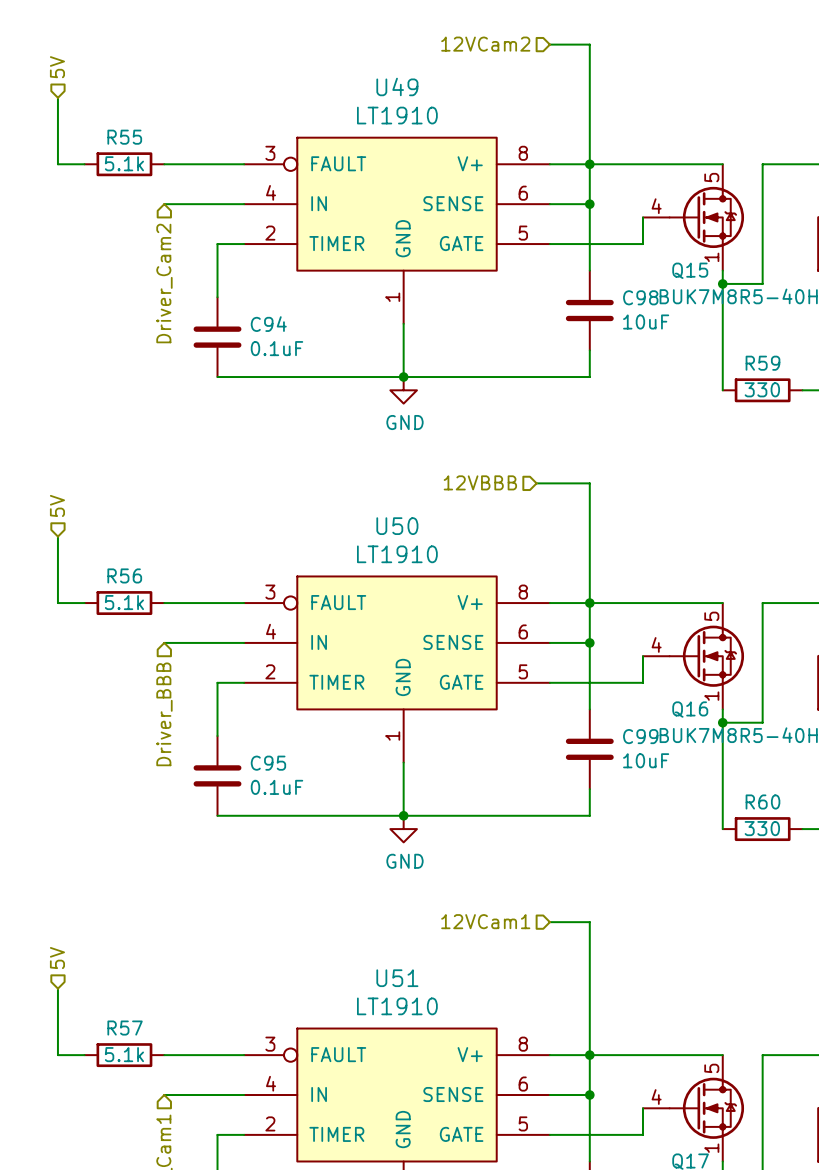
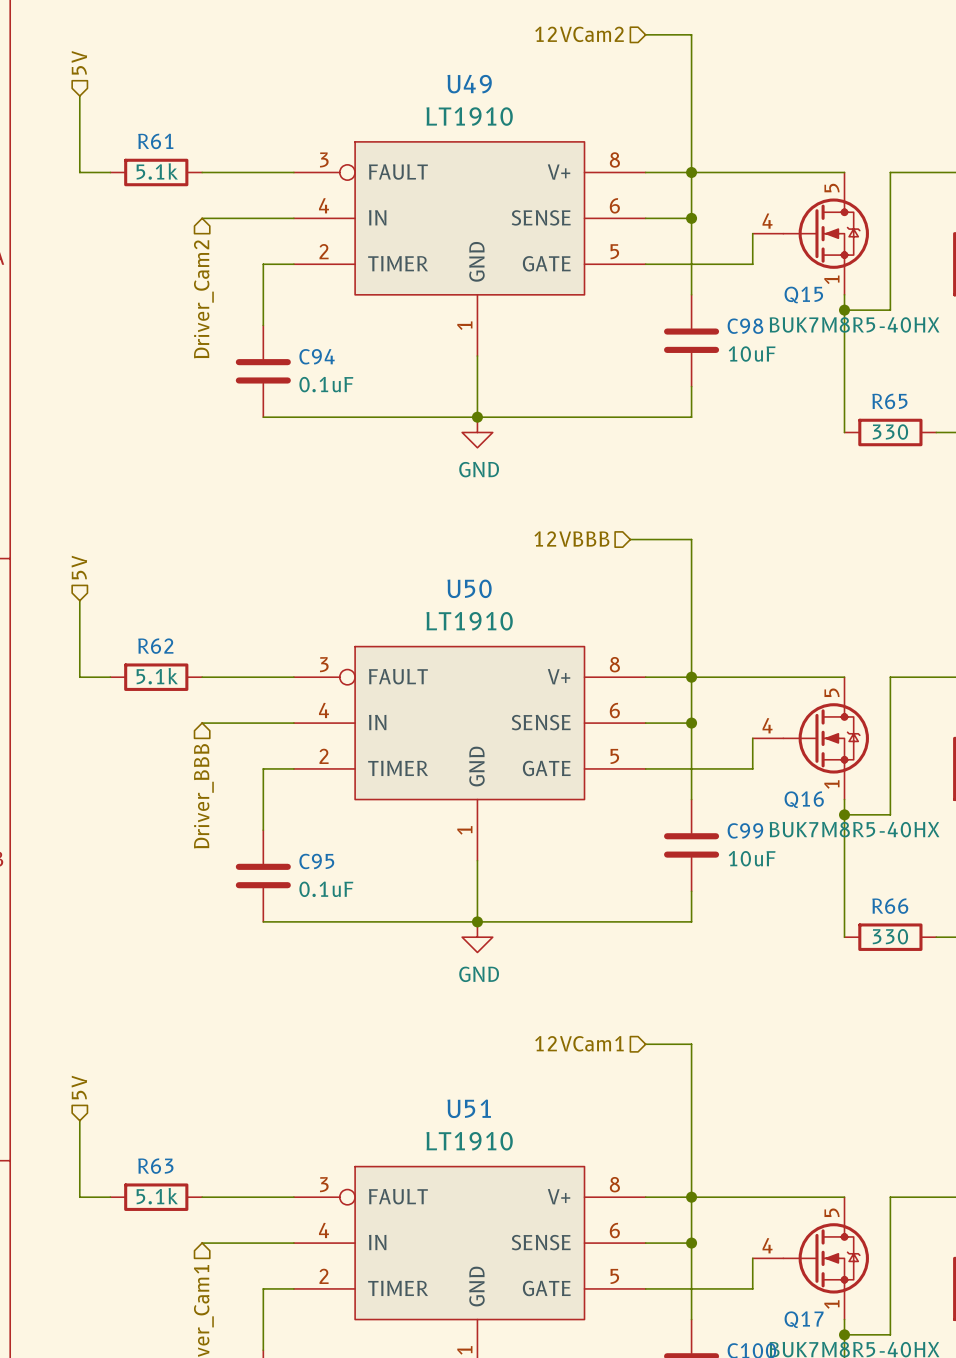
R55 name: R55 (124, 137) -> R61 (155, 141)
R59 name: R59 (762, 363) -> R65 (889, 401)
R56 name: R56 (124, 575) -> R62 (155, 646)
R60 name: R60 (762, 801) -> R66 (890, 906)
R57 name: R57 (125, 1028) -> R63 (155, 1166)

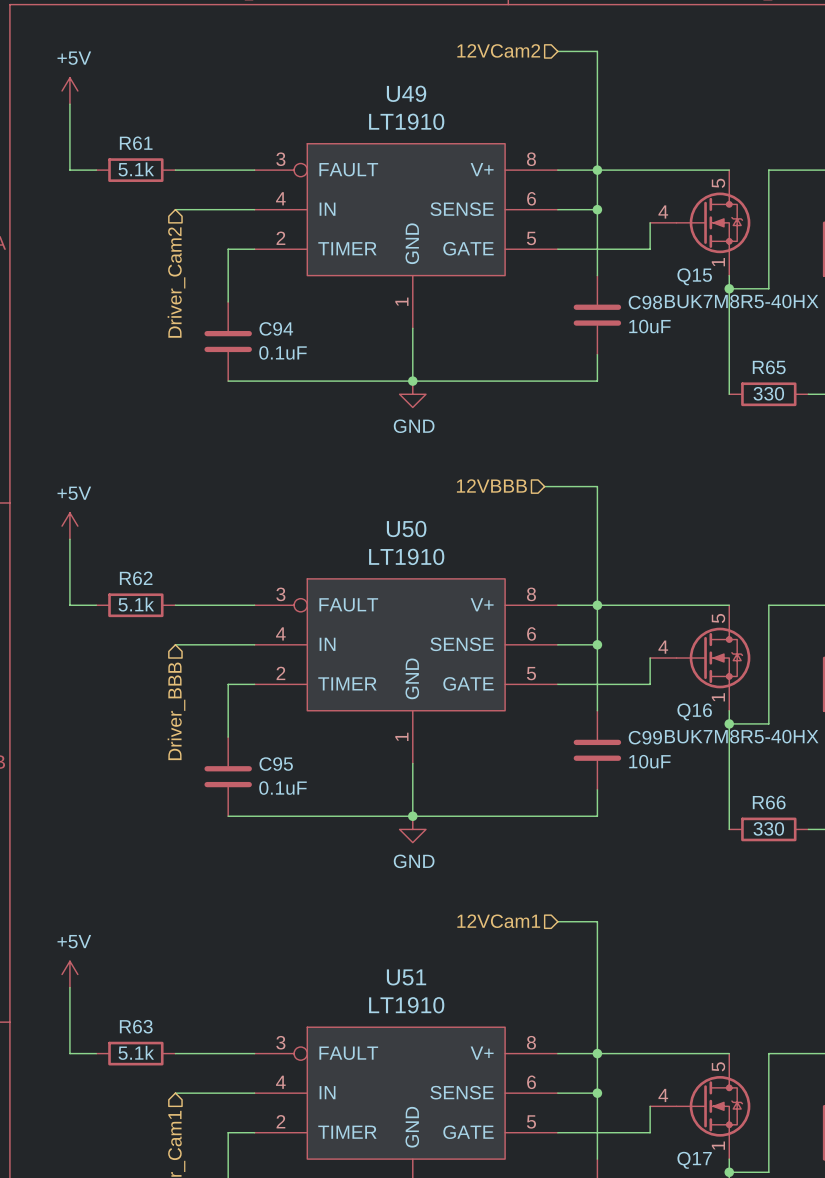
hierarchical label: 5V (79, 62) -> none
power symbol: none -> +5V (69, 90)
hierarchical label: 5V (79, 567) -> none
power symbol: none -> +5V (69, 526)
hierarchical label: 5V (79, 1087) -> none
power symbol: none -> +5V (69, 974)

